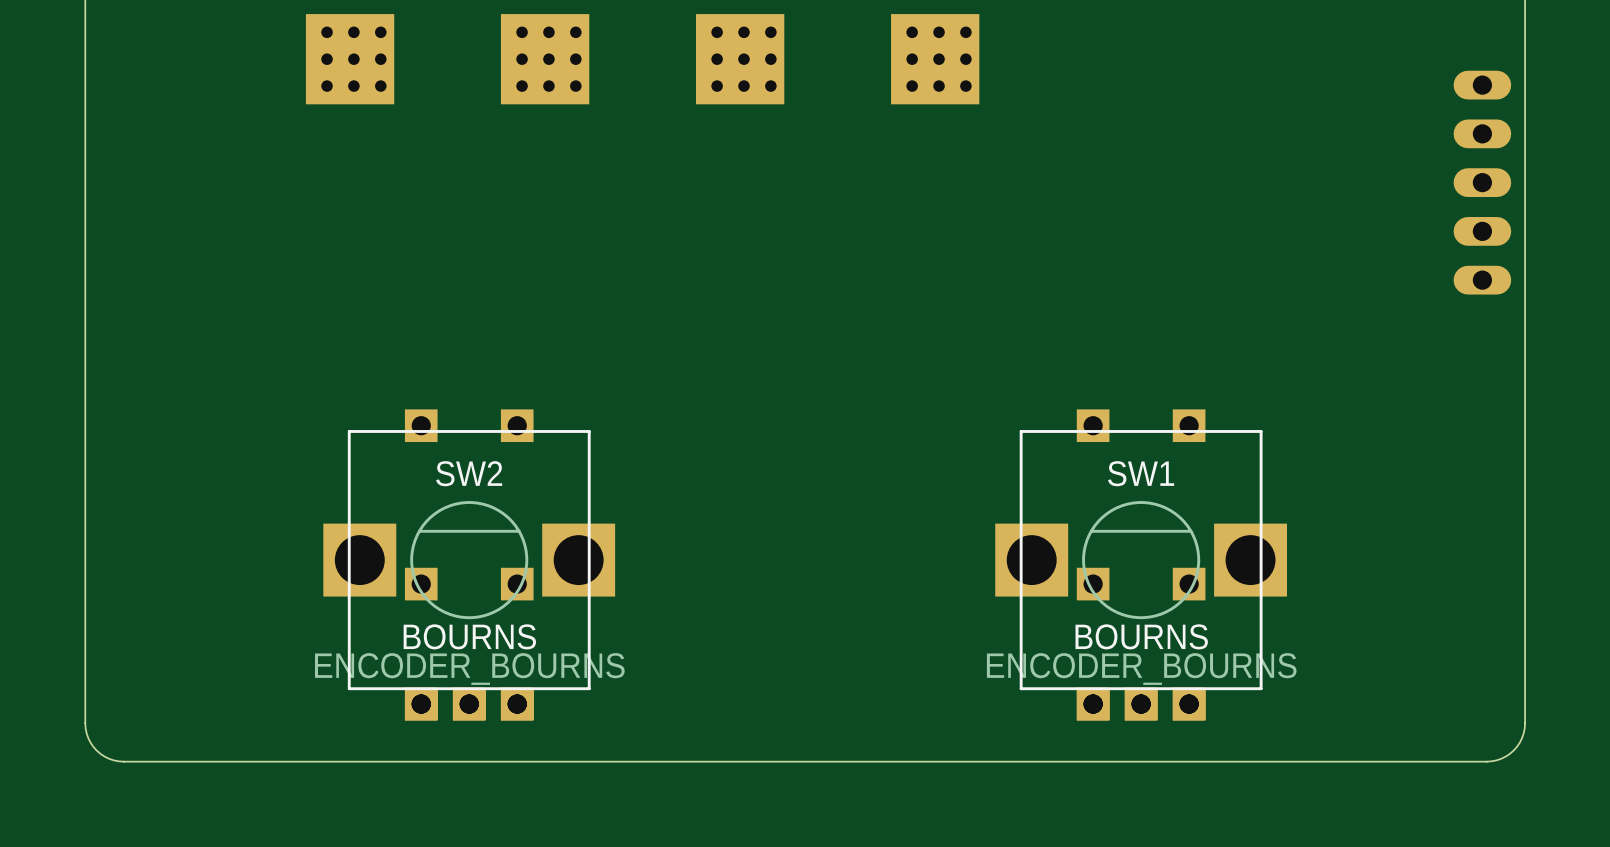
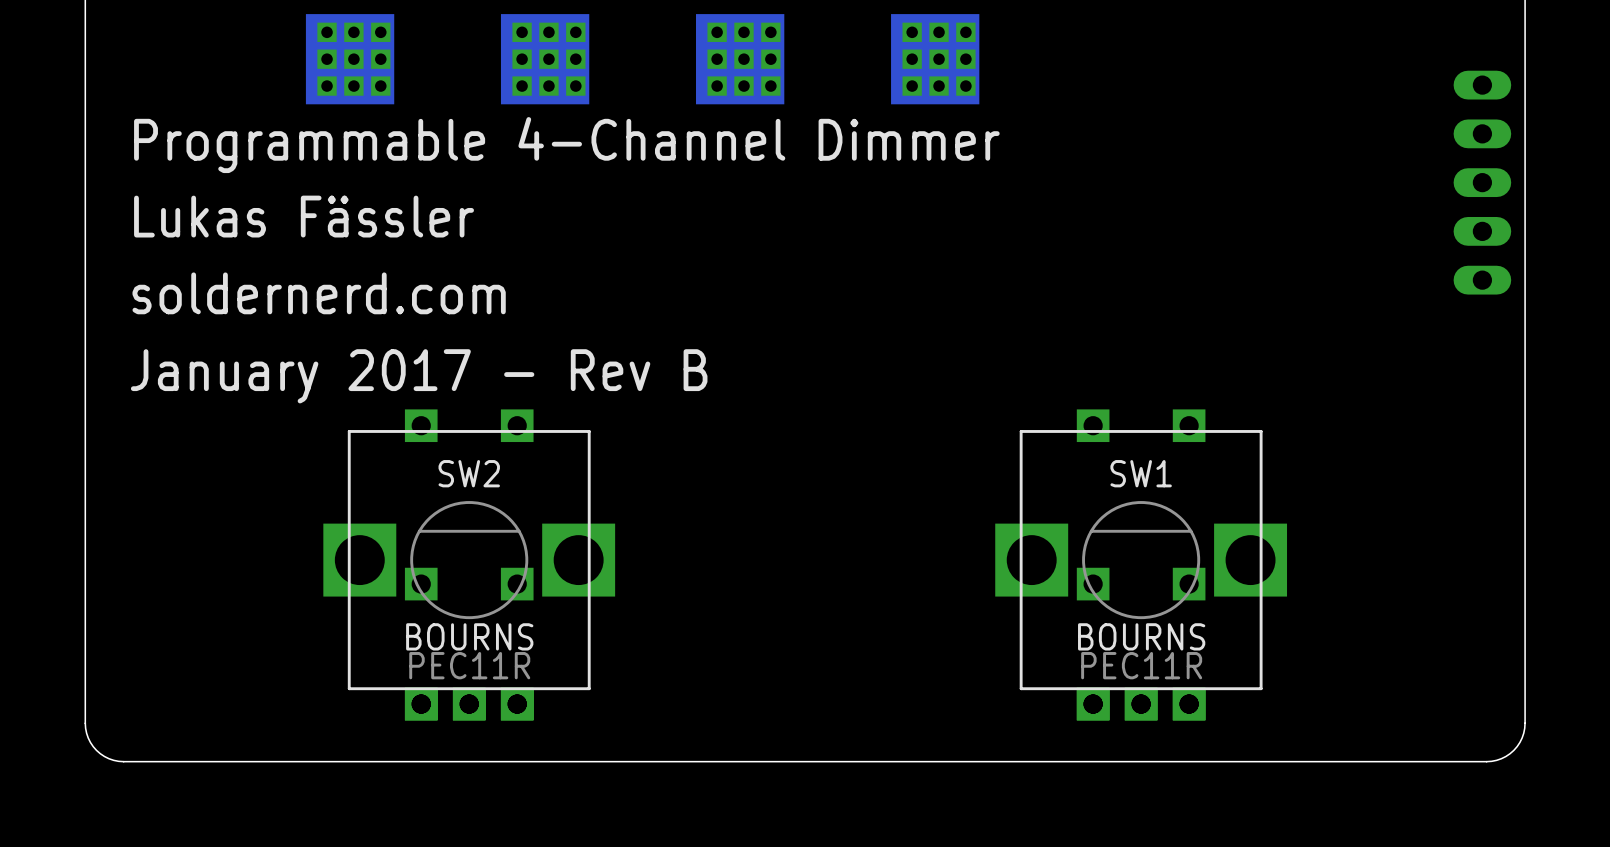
text: none -> Programmable 4-Channel Dimmer (566, 145)
text: none -> Lukas Fässler (304, 216)
text: none -> soldernerd.com (319, 293)
text: none -> January 2017 - Rev B (419, 376)
SW2 value: ENCODER_BOURNS (469, 669) -> PEC11R (469, 665)
SW1 value: ENCODER_BOURNS (1141, 669) -> PEC11R (1141, 665)

